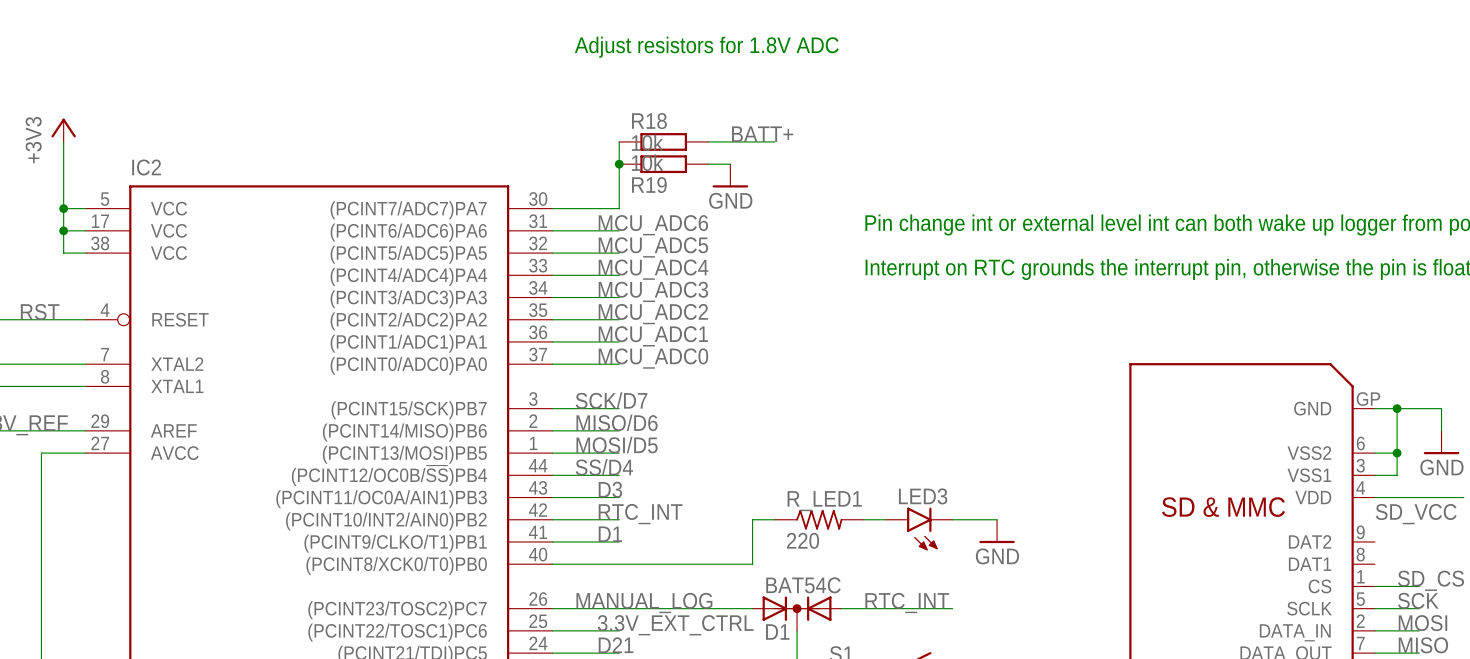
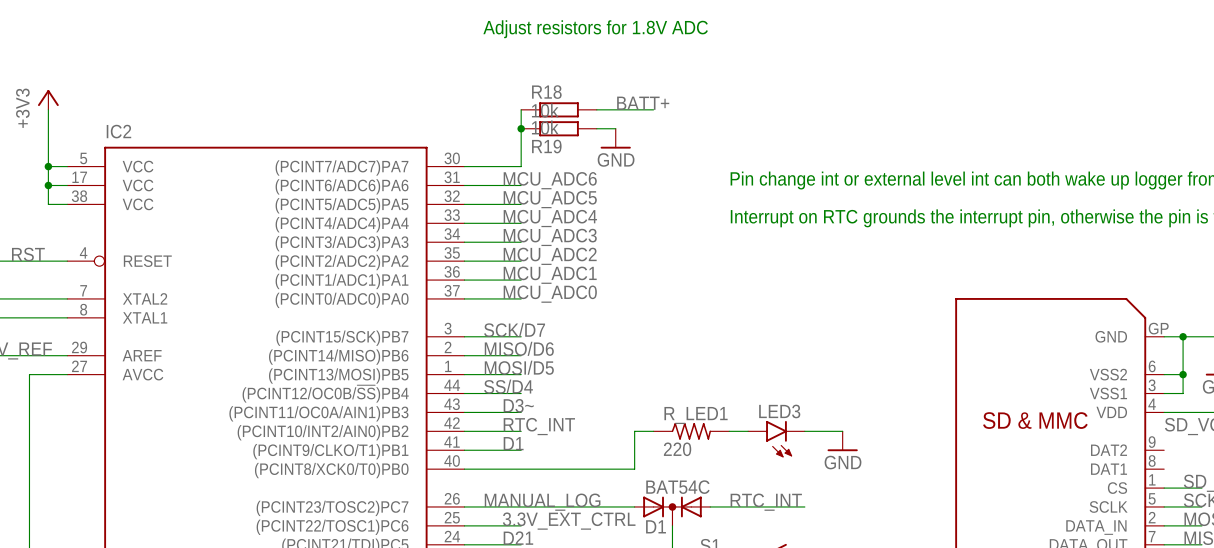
label: D3 (610, 489) -> D3~ (518, 405)

